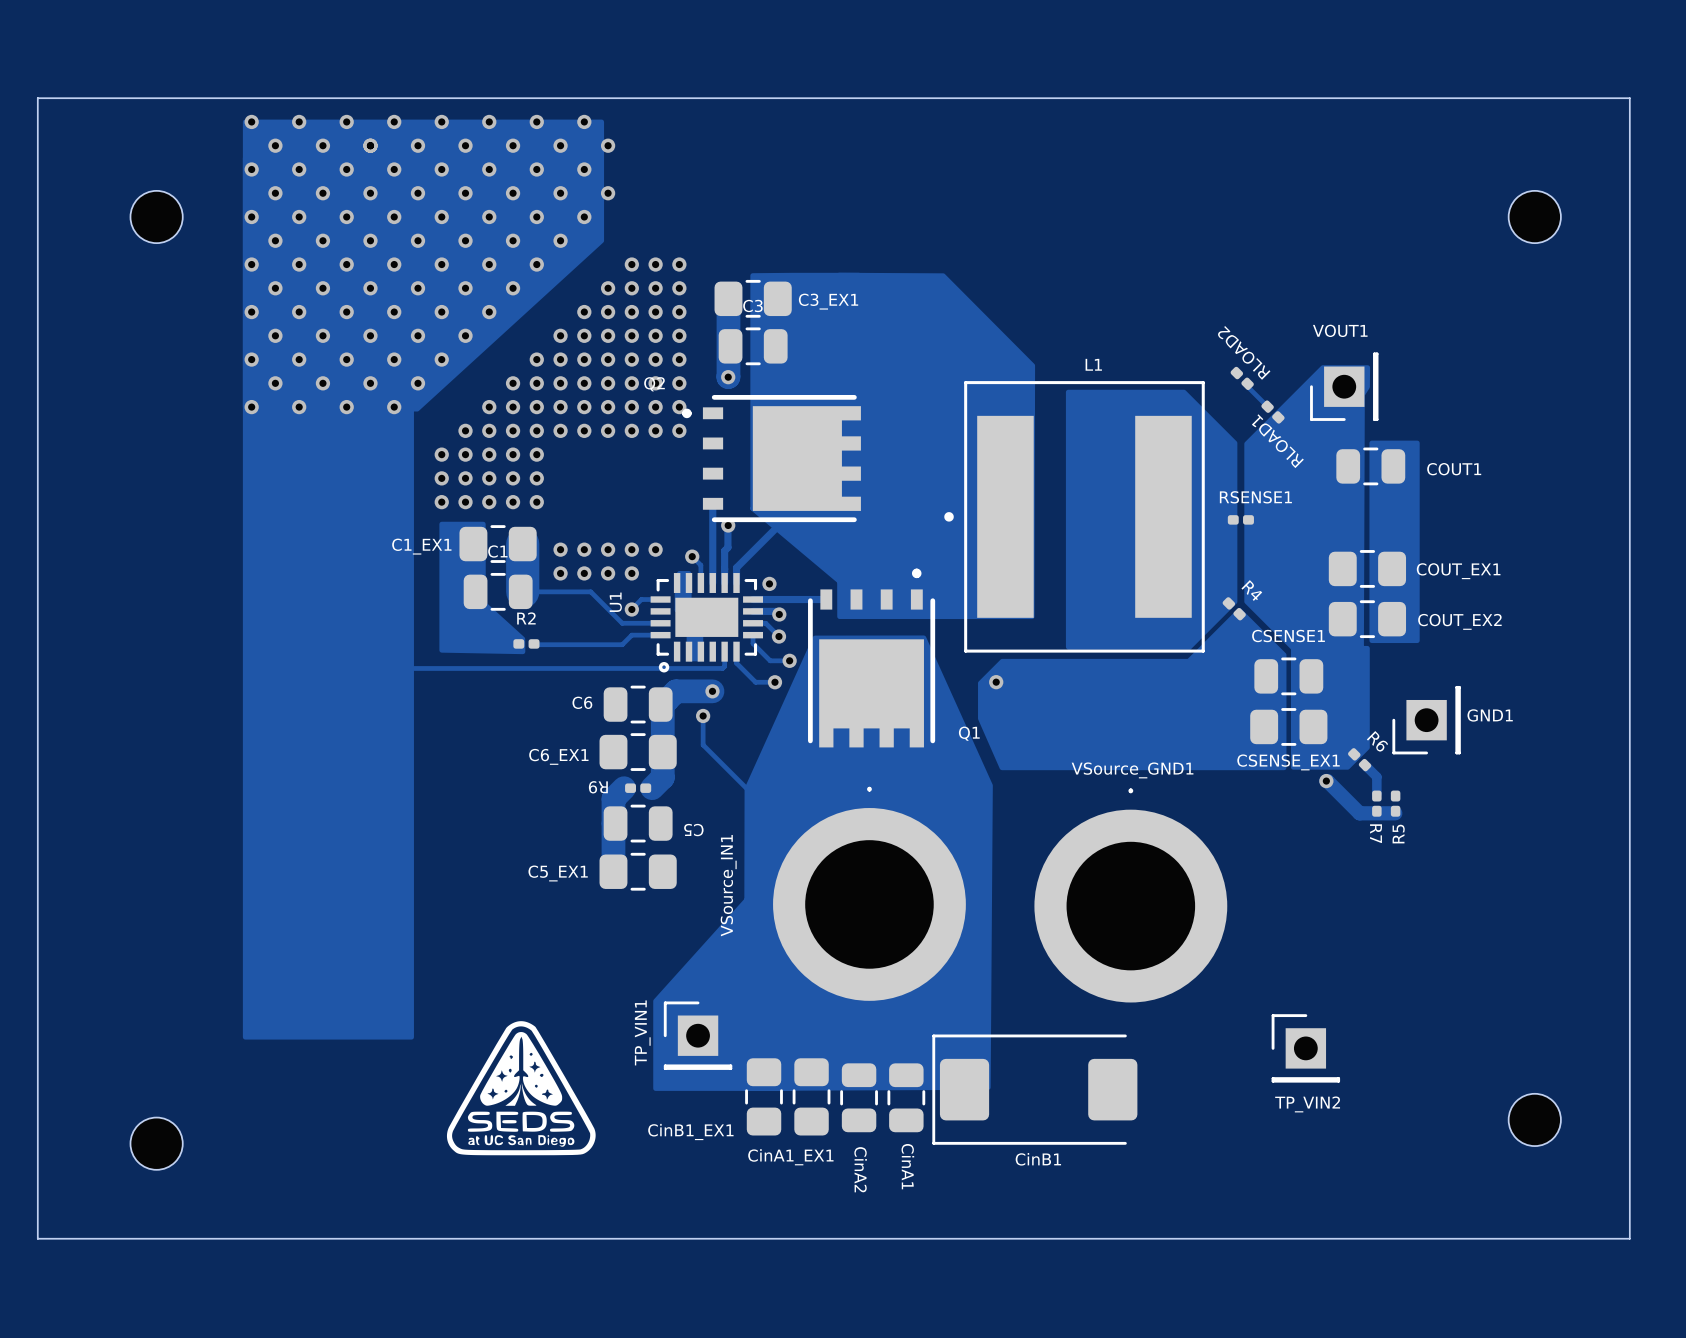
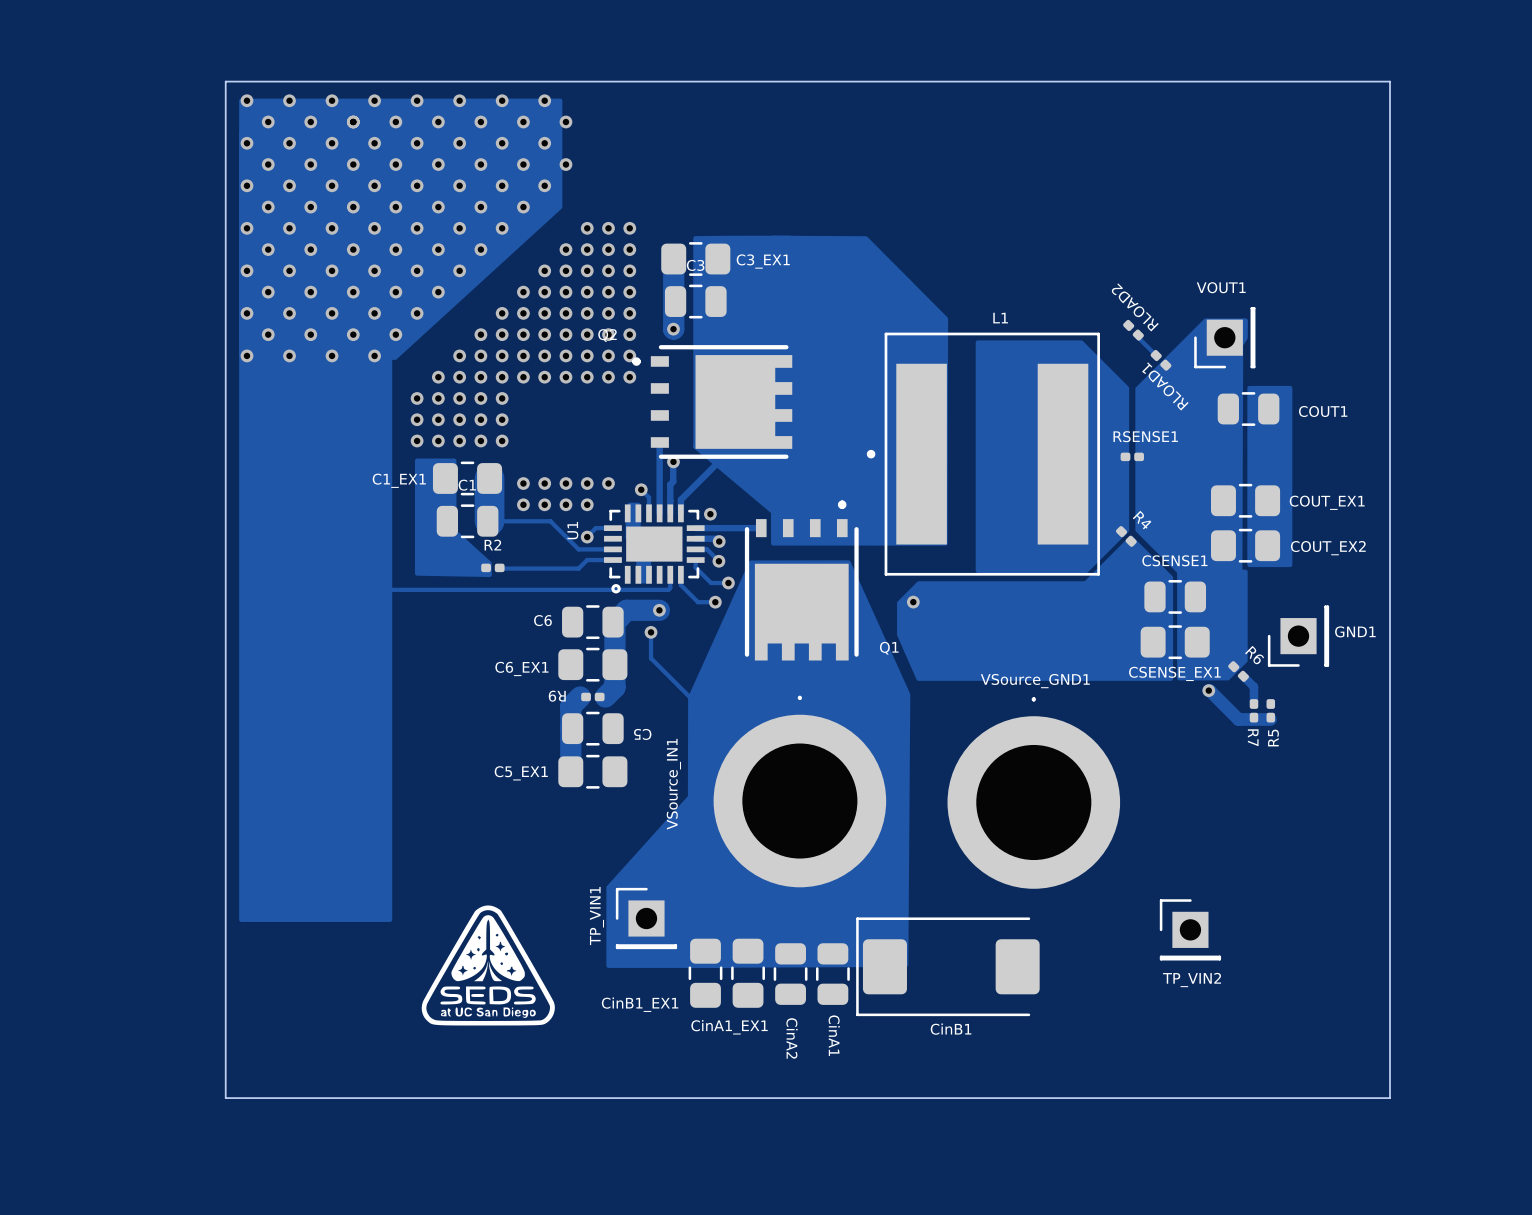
board edge: (37, 98) (1629, 98) (1629, 1238) (37, 1238) (37, 98) -> (225, 81) (225, 1098) (1390, 1098) (1390, 81) (225, 81)
part: (156, 217) -> none
part: (1534, 217) -> none
part: (1534, 1119) -> none
part: (156, 1143) -> none

